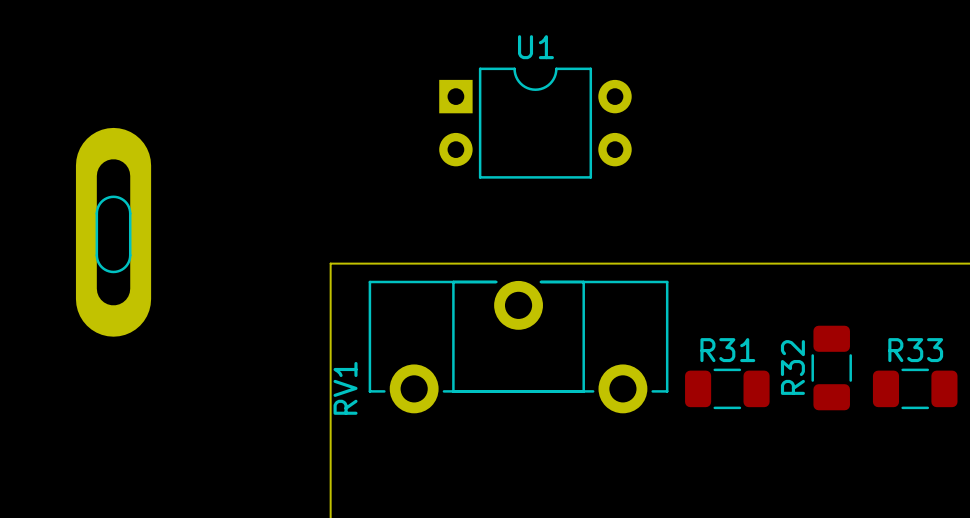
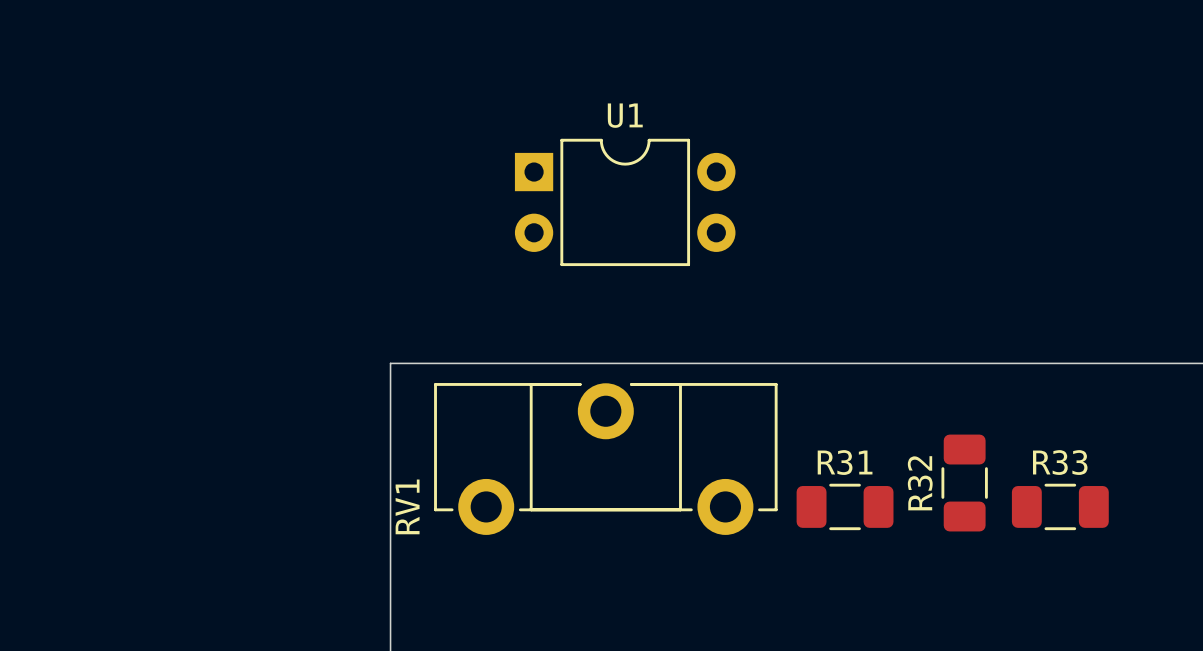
part: (113, 232) -> none

